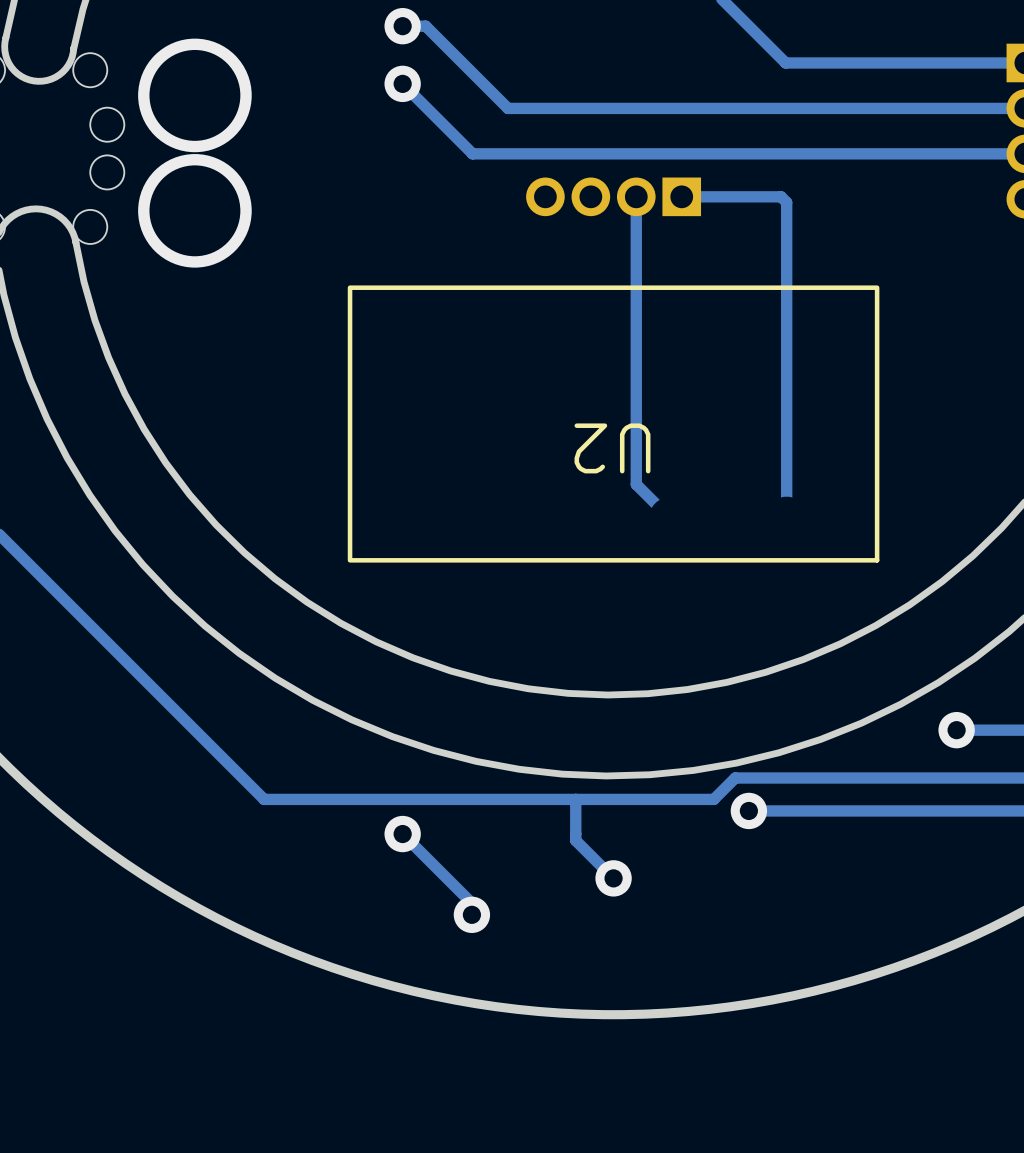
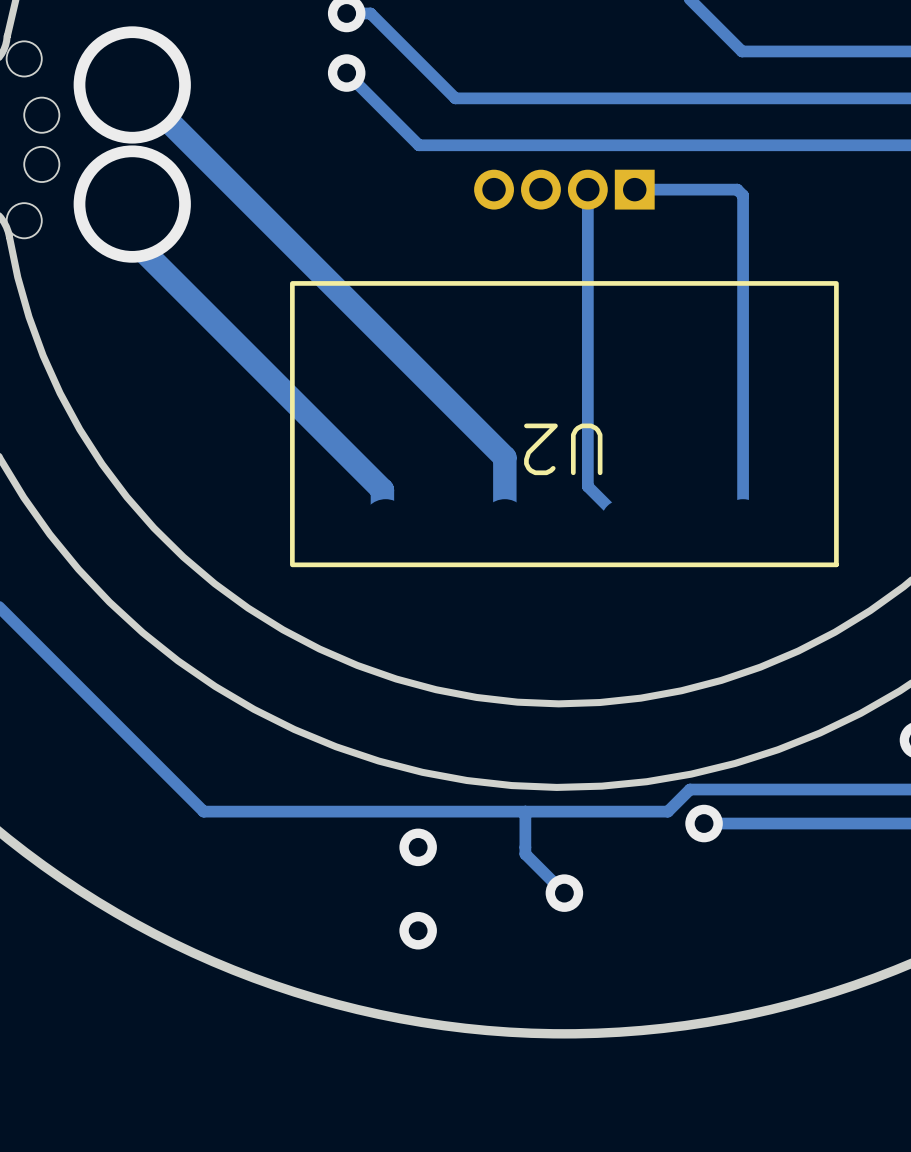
track: none -> (132, 84) (504, 457) (504, 522)
track: none -> (132, 239) (382, 489) (382, 513)
track: (402, 834) (471, 903) (471, 914) -> none
via position: (402, 834) -> (418, 847)

